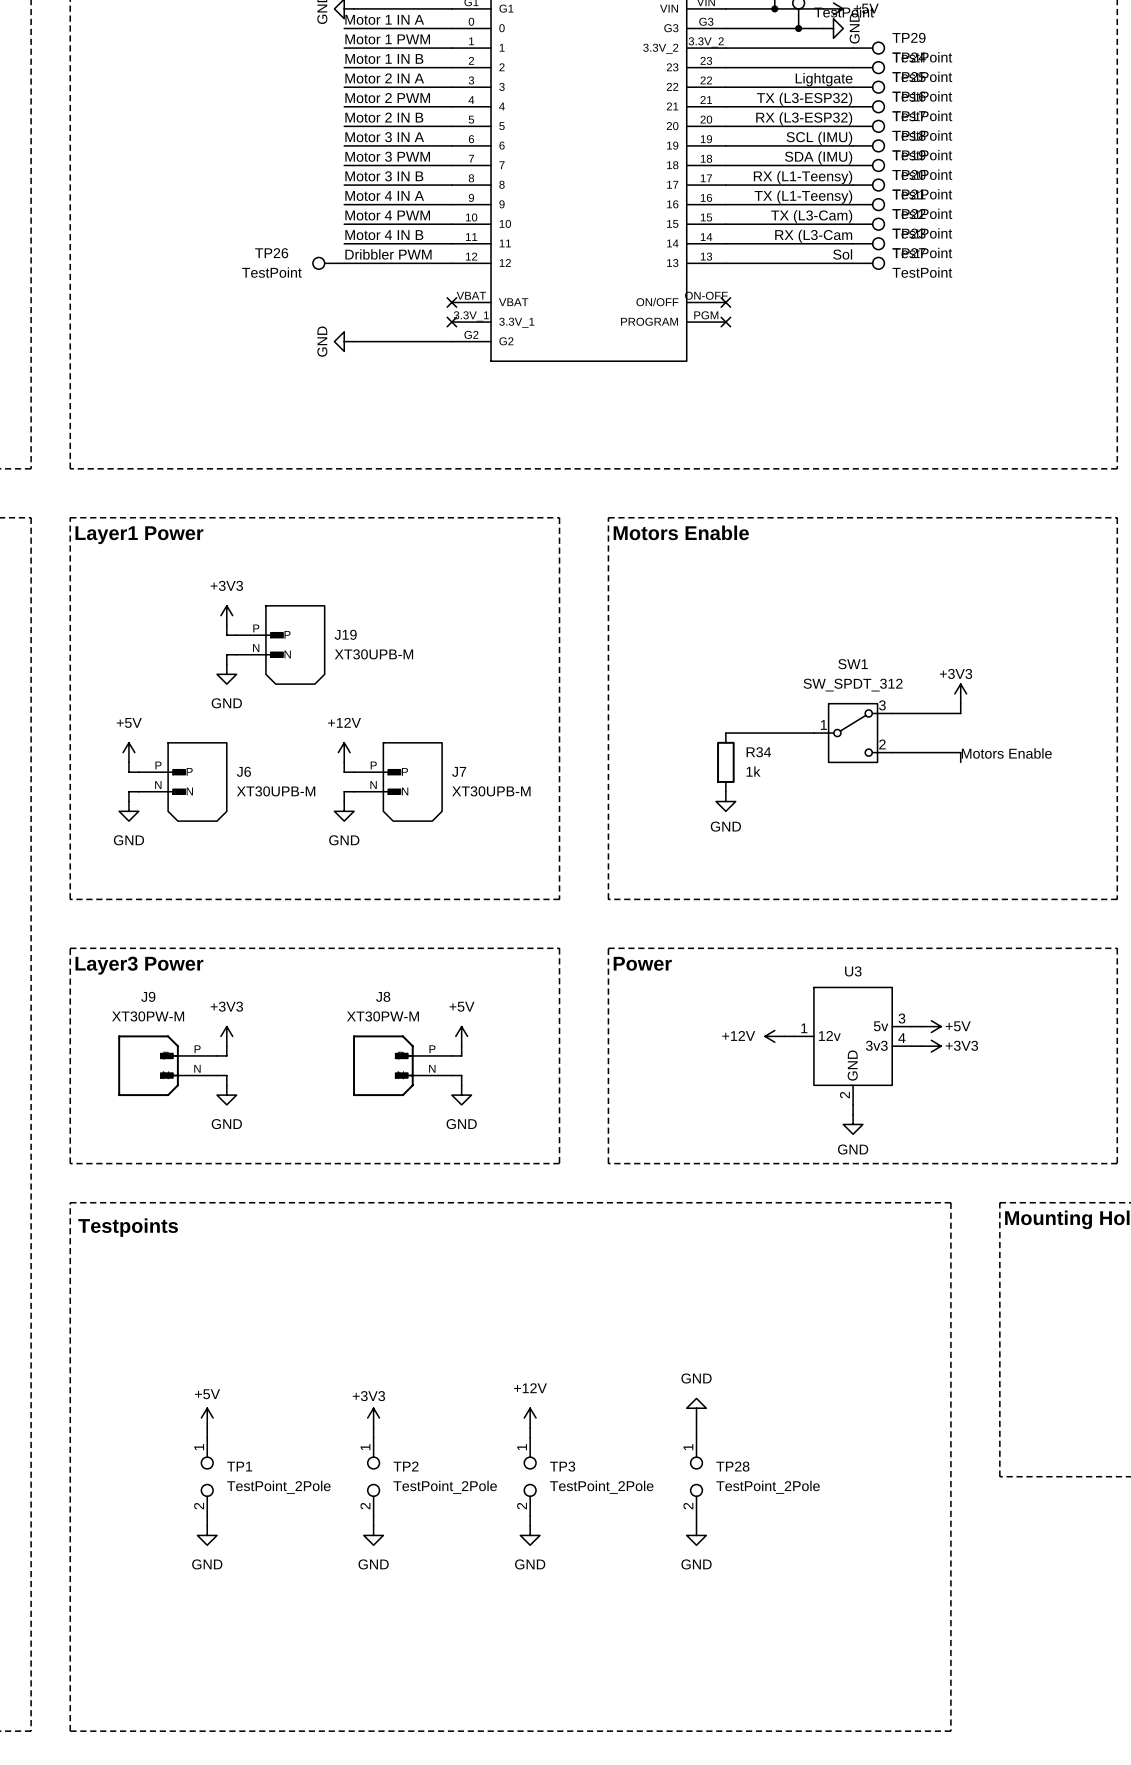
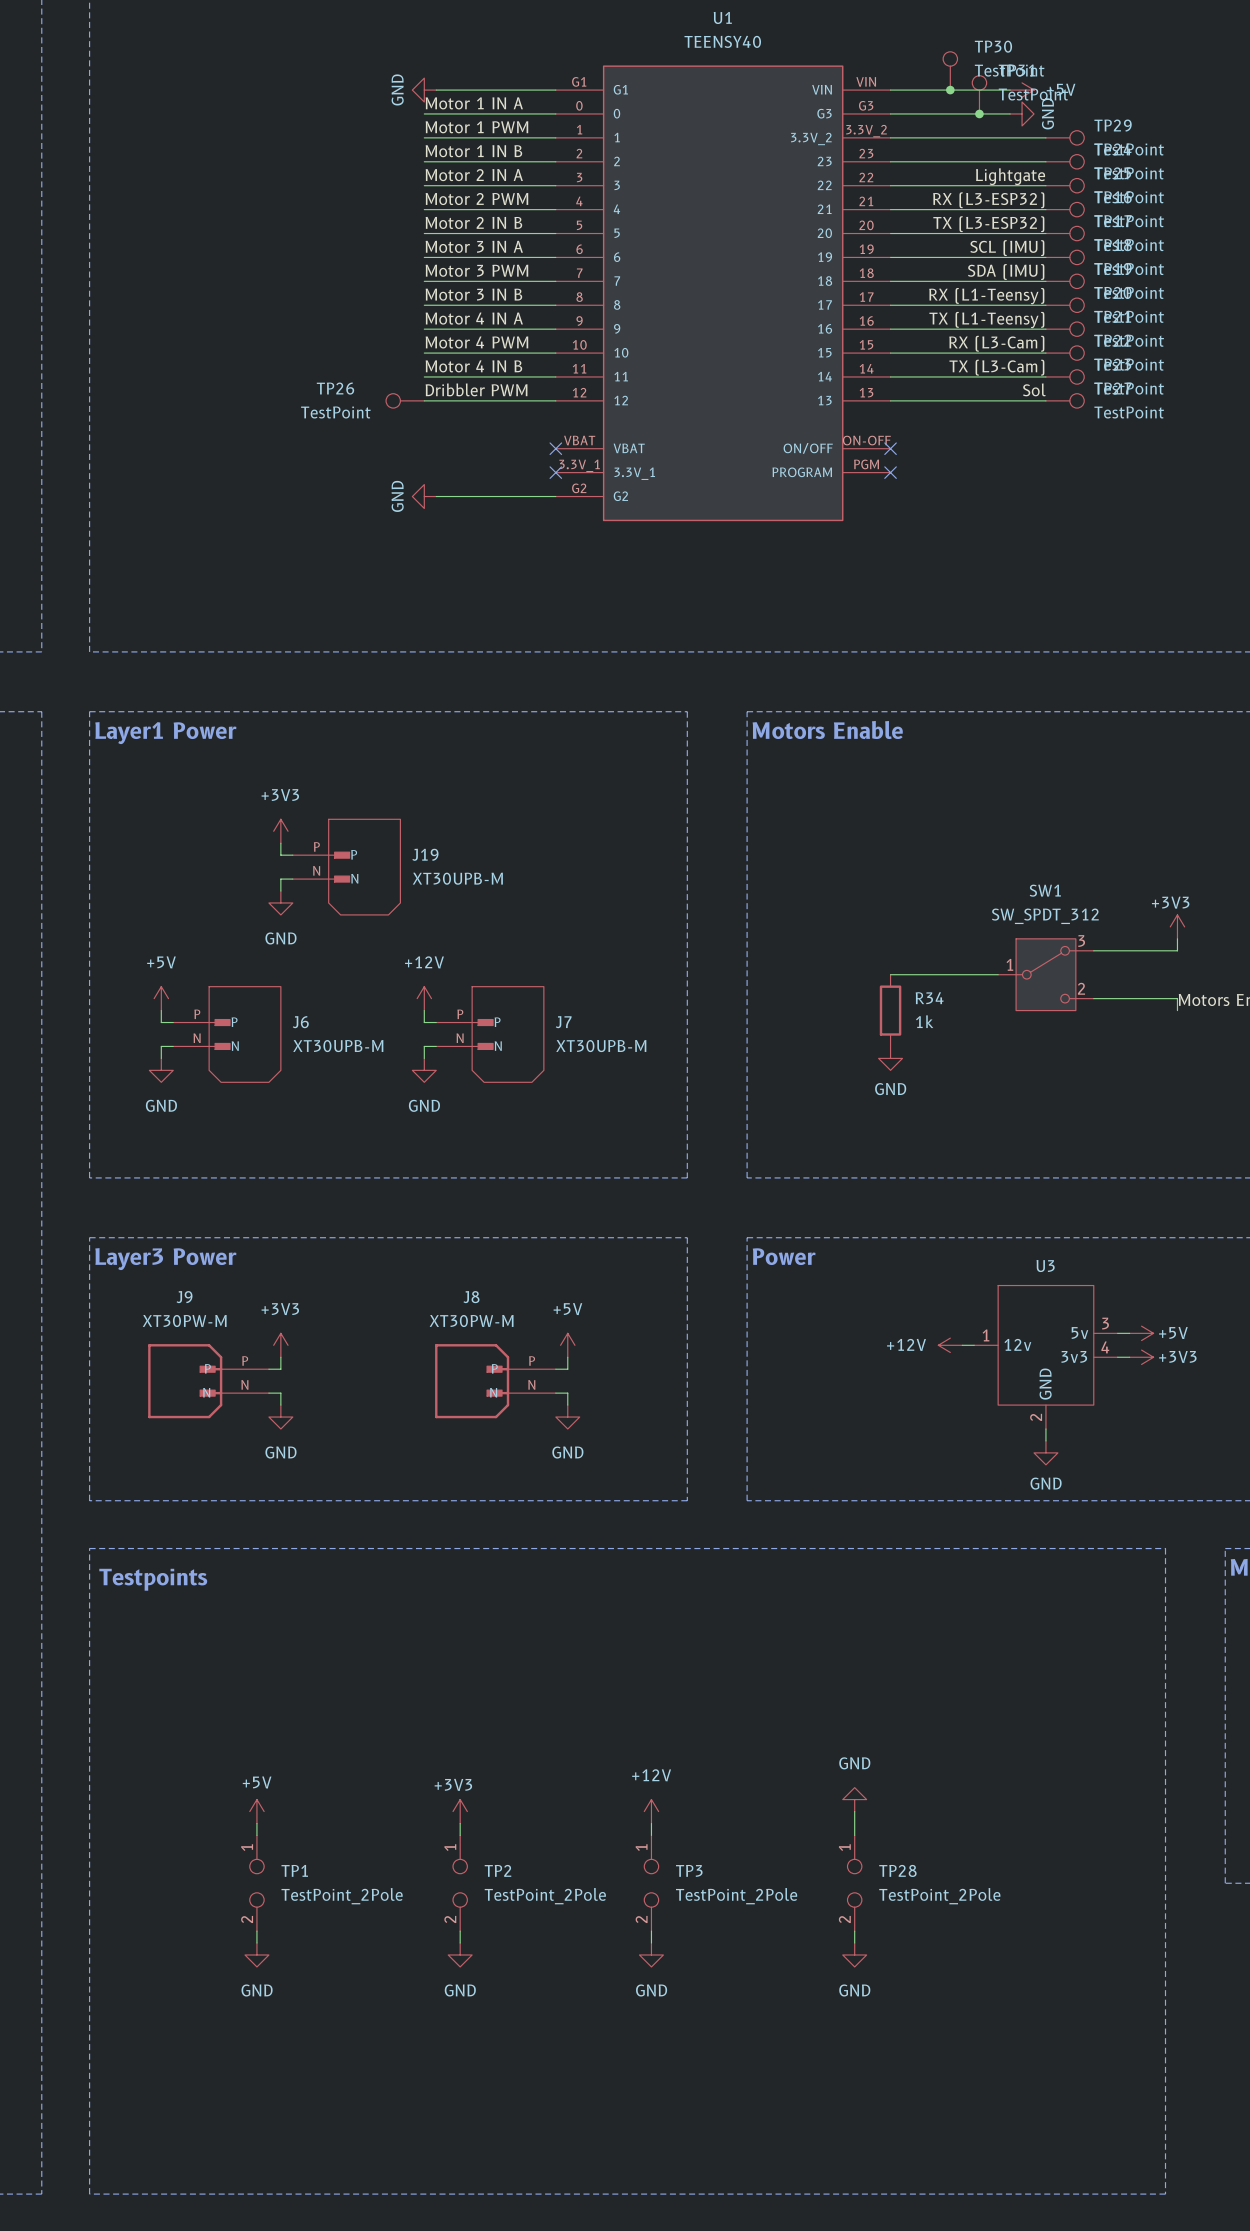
label: TX (L3-ESP32) (804, 99) -> RX (L3-ESP32) (988, 200)
label: RX (L3-ESP32) (804, 118) -> TX (L3-ESP32) (988, 224)
label: TX (L3-Cam) (811, 216) -> RX (L3-Cam) (996, 343)
label: RX (L3-Cam (813, 236) -> TX (L3-Cam) (996, 367)

